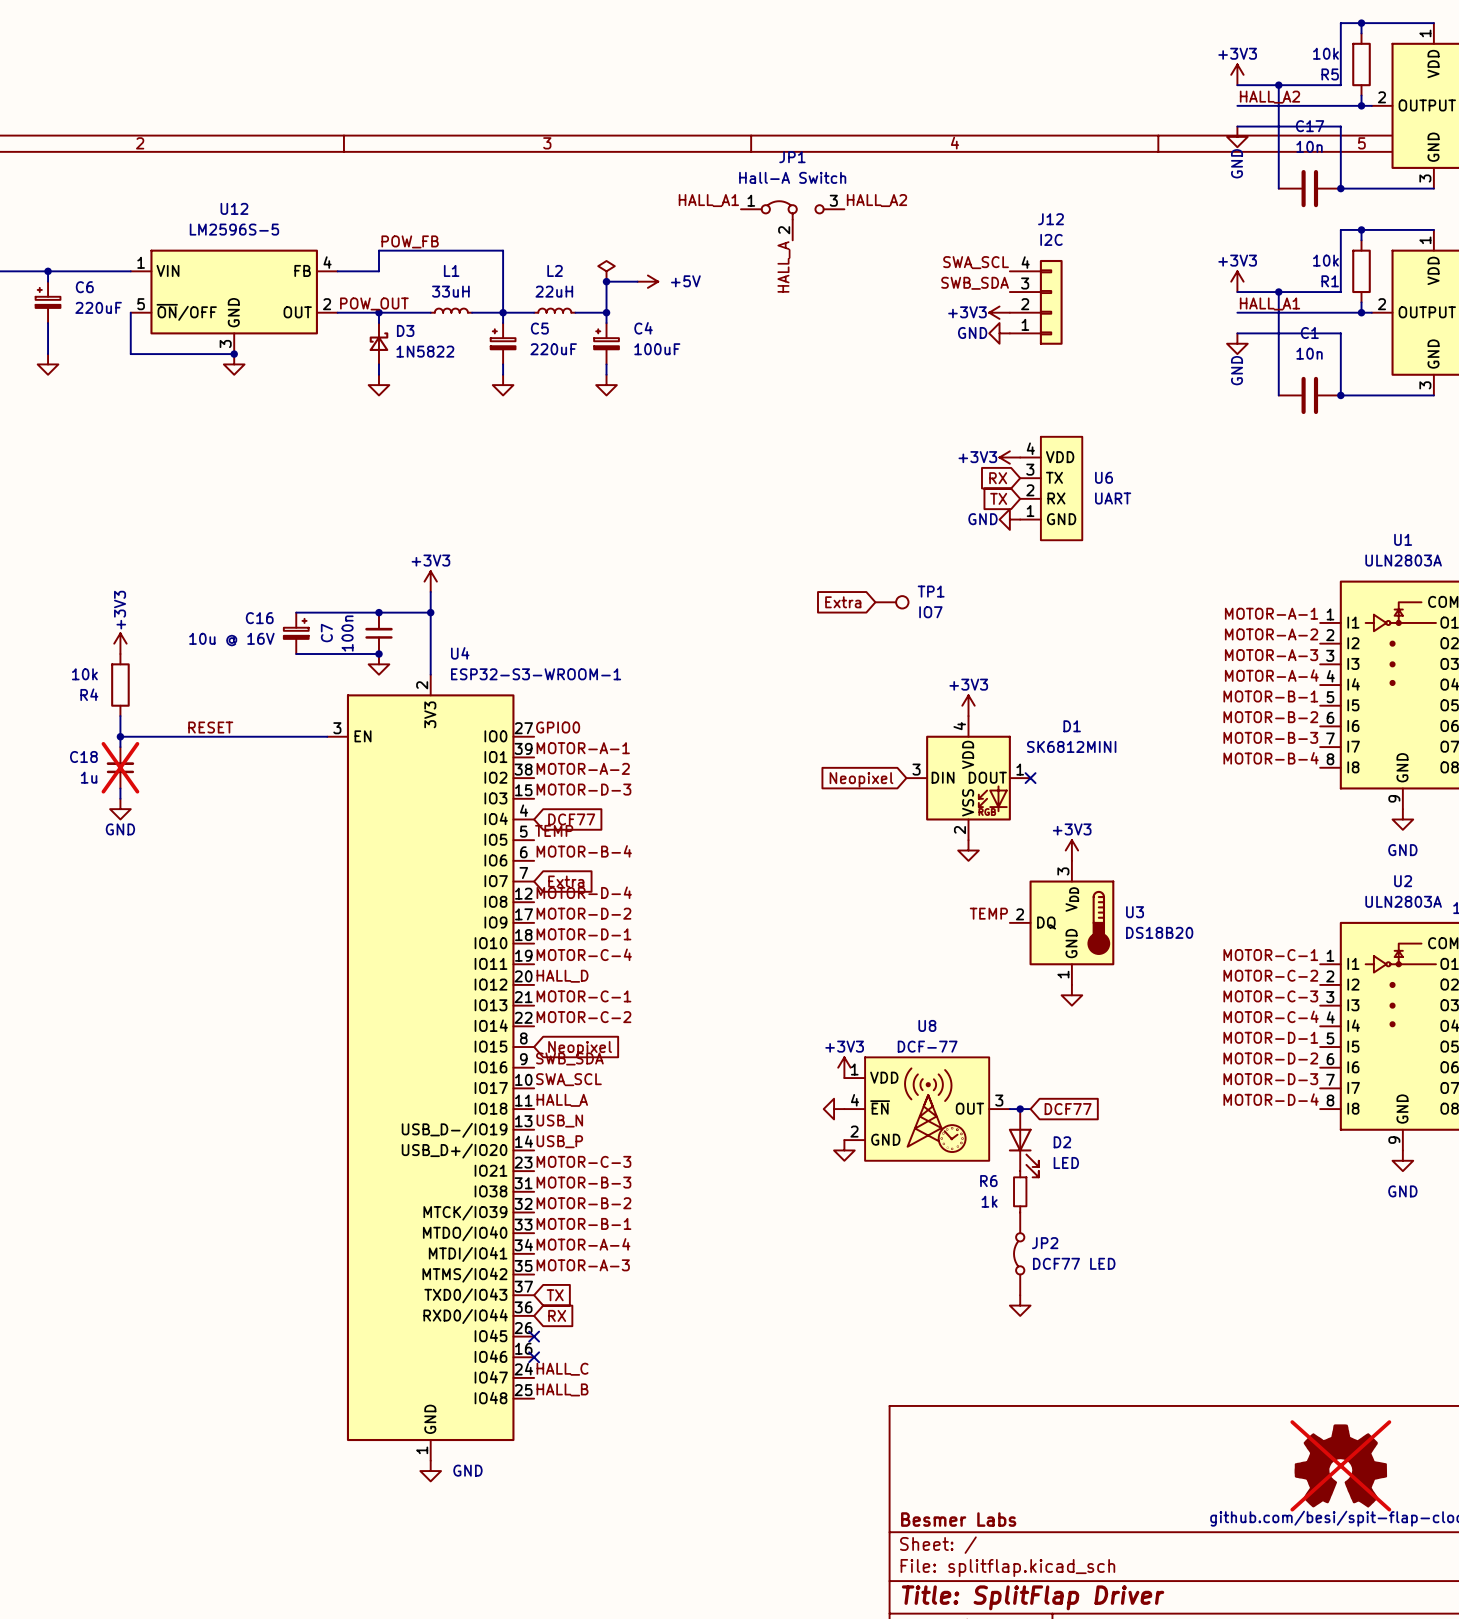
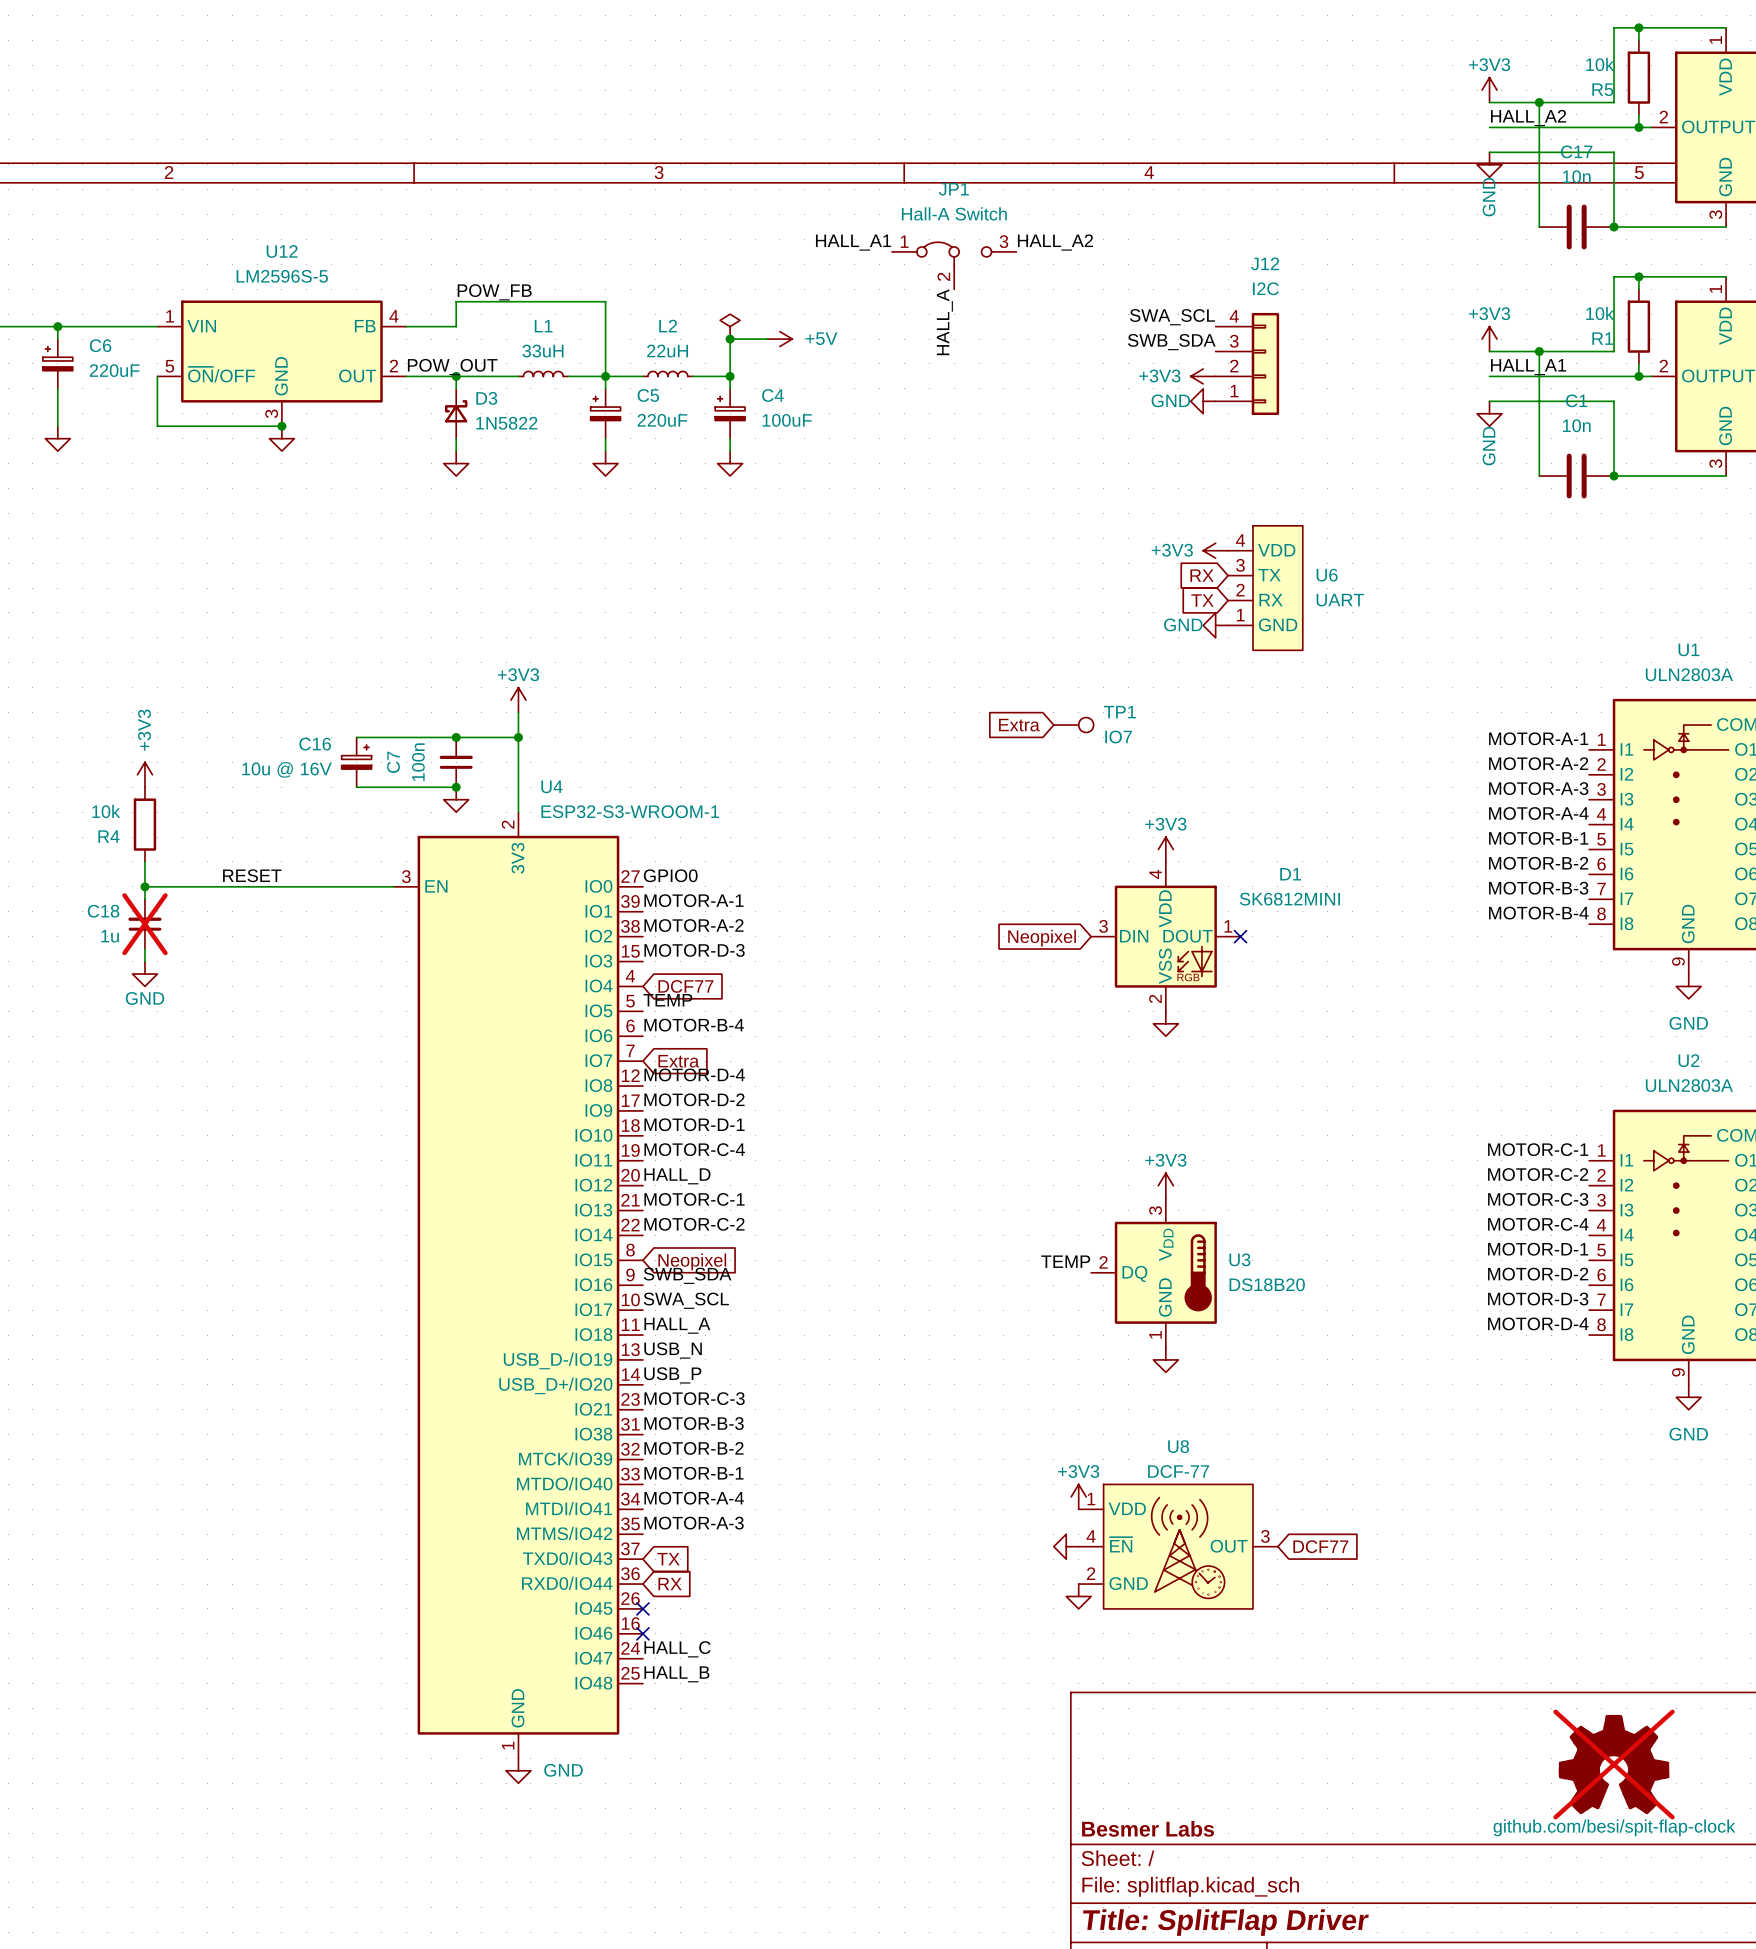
power symbol: +3V3 (1071, 850) -> none
label position: TEMP (988, 913) -> TEMP (1065, 1261)
U3 position: (1062, 922) -> (1154, 1272)
power symbol: none -> +3V3 (1165, 1185)
power symbol: (1071, 995) -> none
power symbol: +3V3 (844, 1067) -> none
power symbol: (834, 1109) -> none
U8 position: (927, 1109) -> (1178, 1546)
wire: (1009, 1109) (1030, 1109) -> none
junction: (1020, 1109) -> none
global label position: DCF77 (1068, 1109) -> DCF77 (1320, 1546)
power symbol: none -> (1165, 1359)
D2: LED (1023, 1143) -> none
power symbol: (844, 1150) -> none
R6: 1k (1020, 1191) -> none
power symbol: none -> +3V3 (1078, 1496)
JP2: DCF77 LED (1019, 1253) -> none
power symbol: none -> (1066, 1546)
power symbol: (1020, 1305) -> none
power symbol: none -> (1078, 1596)

